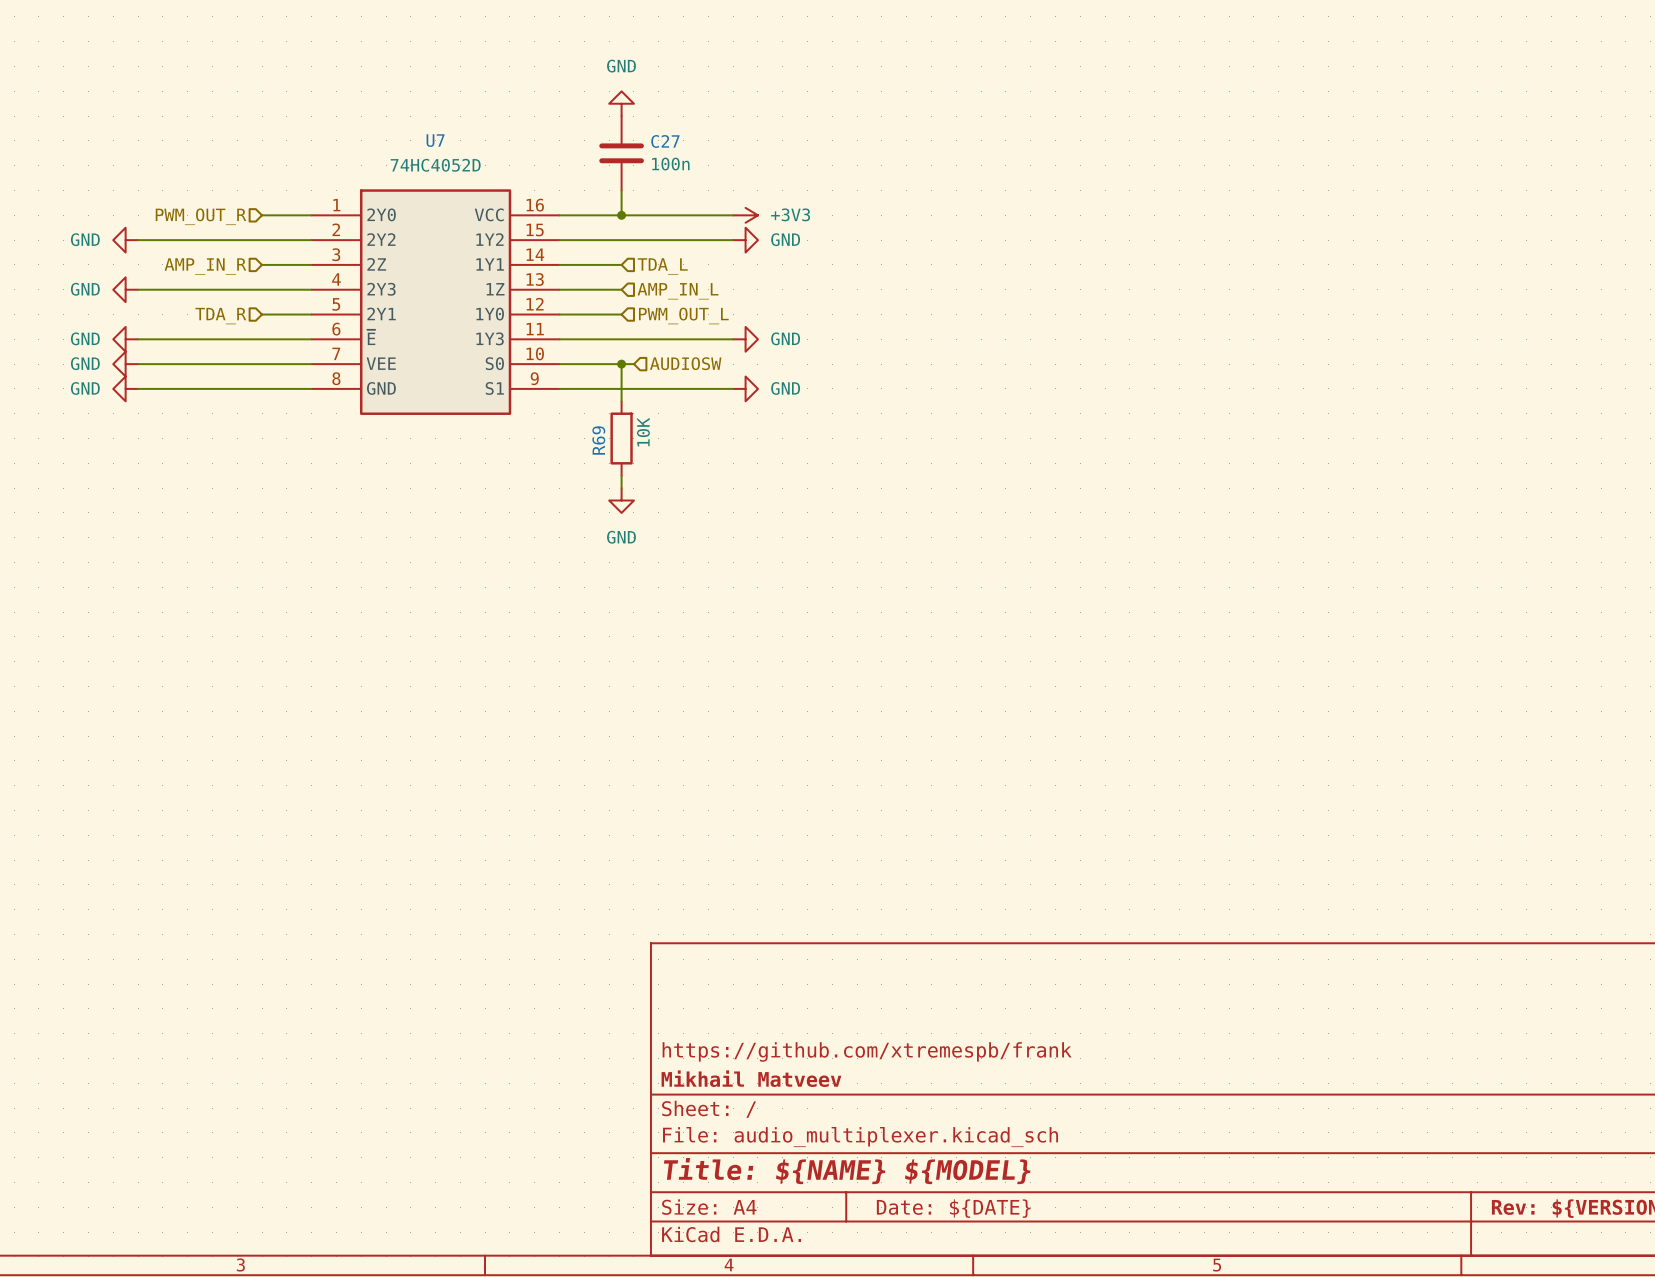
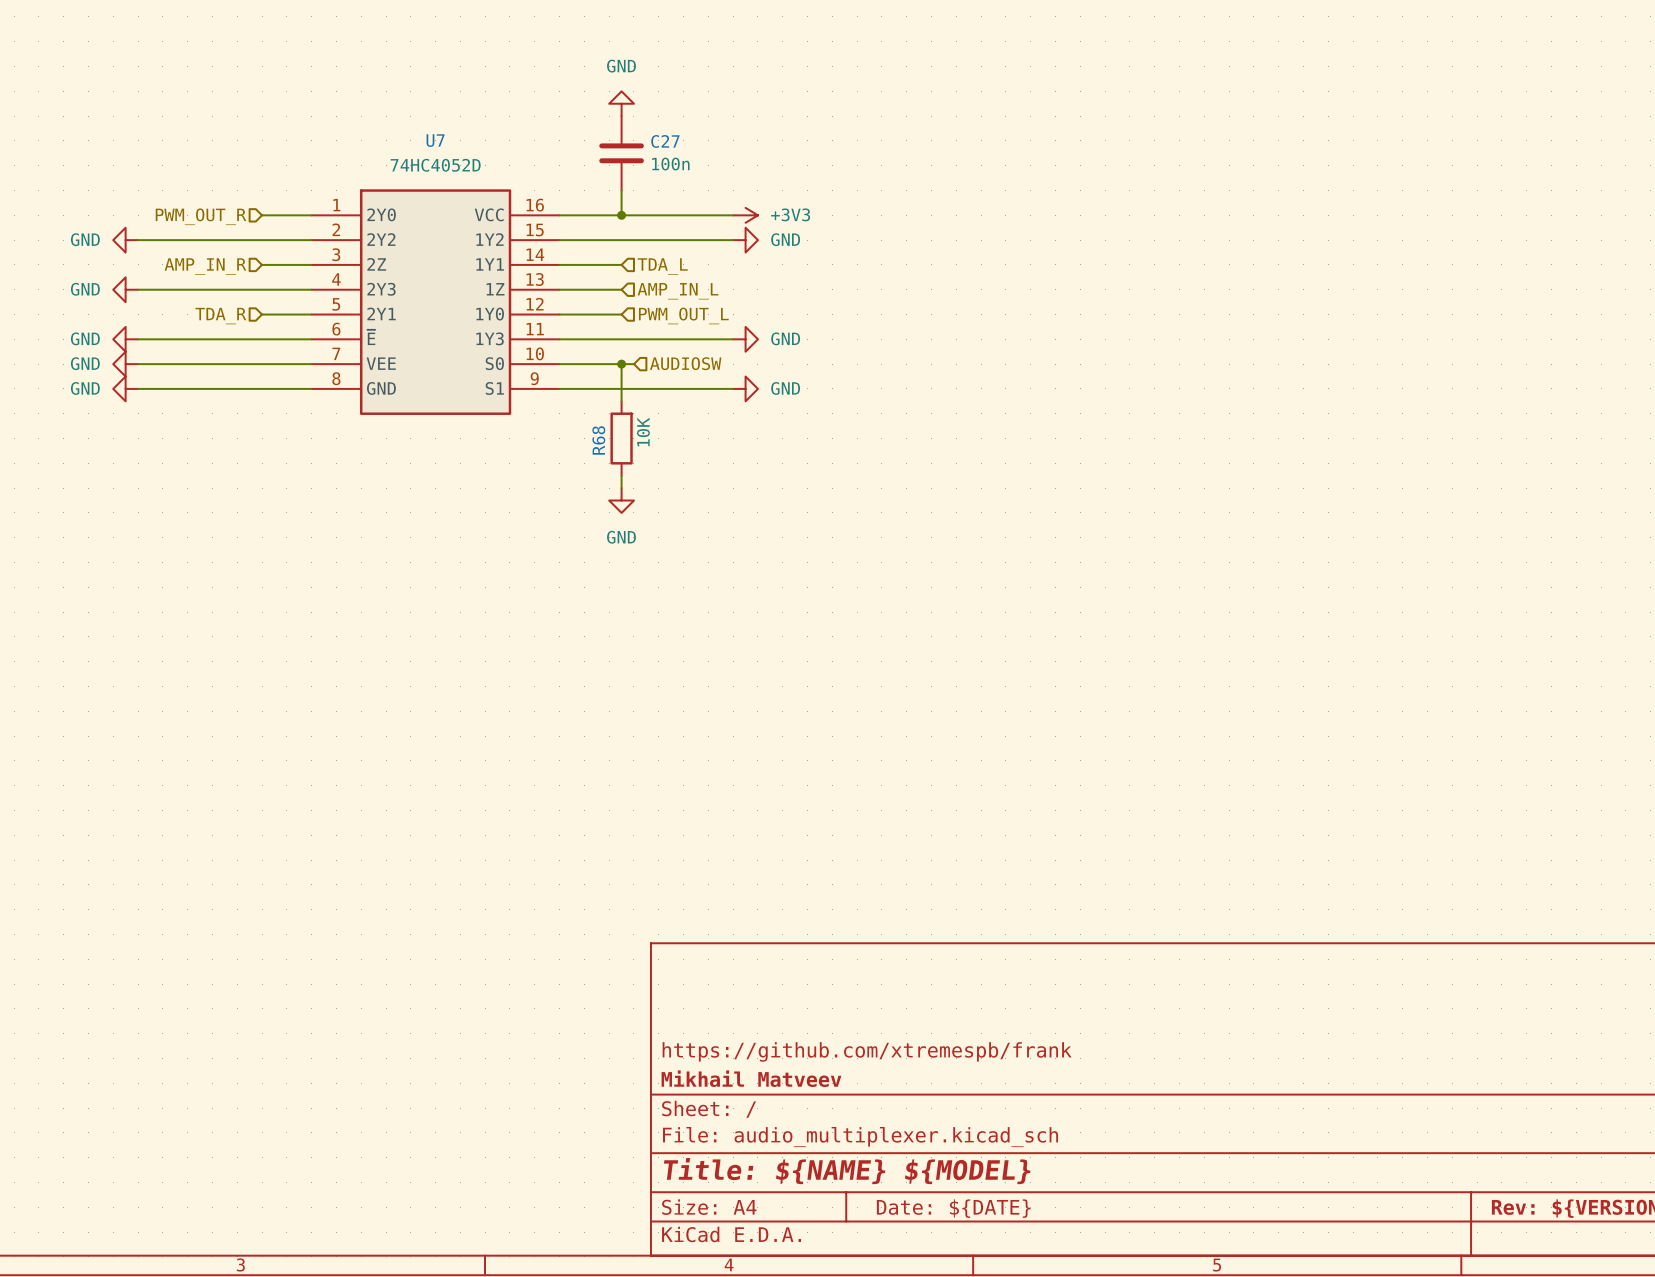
R69 name: R69 (598, 440) -> R68 (598, 440)

